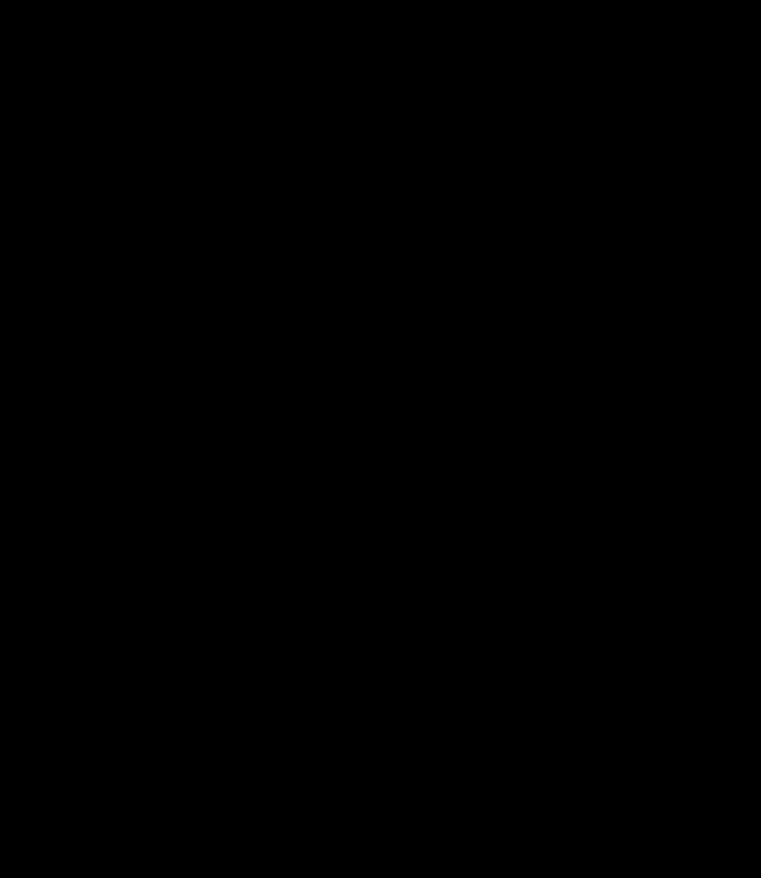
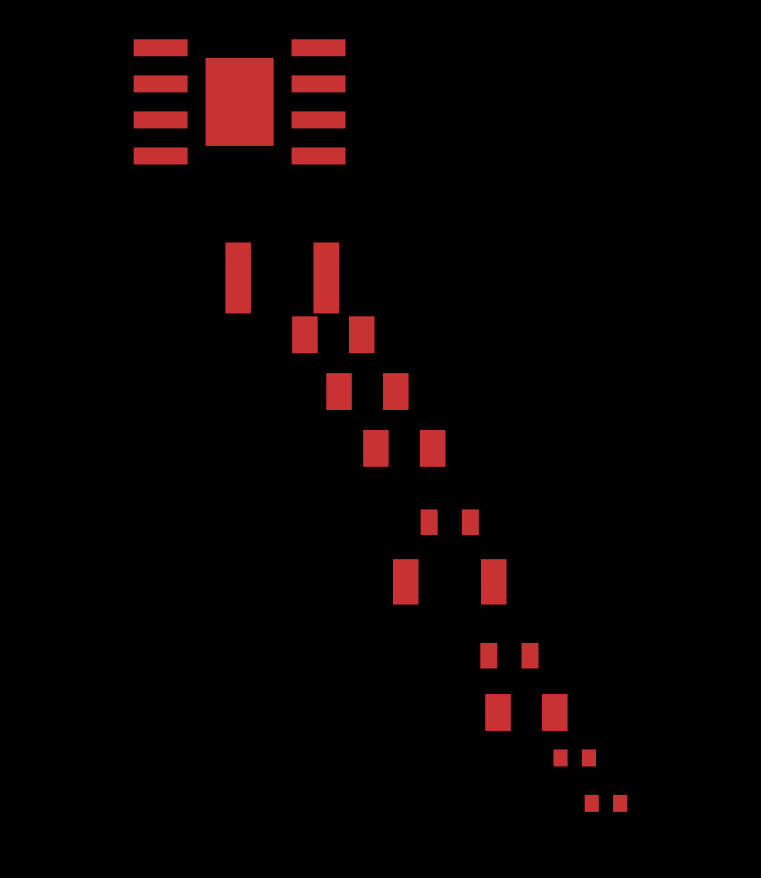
part: none -> (239, 101)
part: none -> (282, 277)
part: none -> (333, 334)
part: none -> (367, 391)
part: none -> (404, 448)
part: none -> (449, 522)
part: none -> (449, 581)
part: none -> (509, 655)
part: none -> (526, 712)
part: none -> (574, 757)
part: none -> (605, 803)

